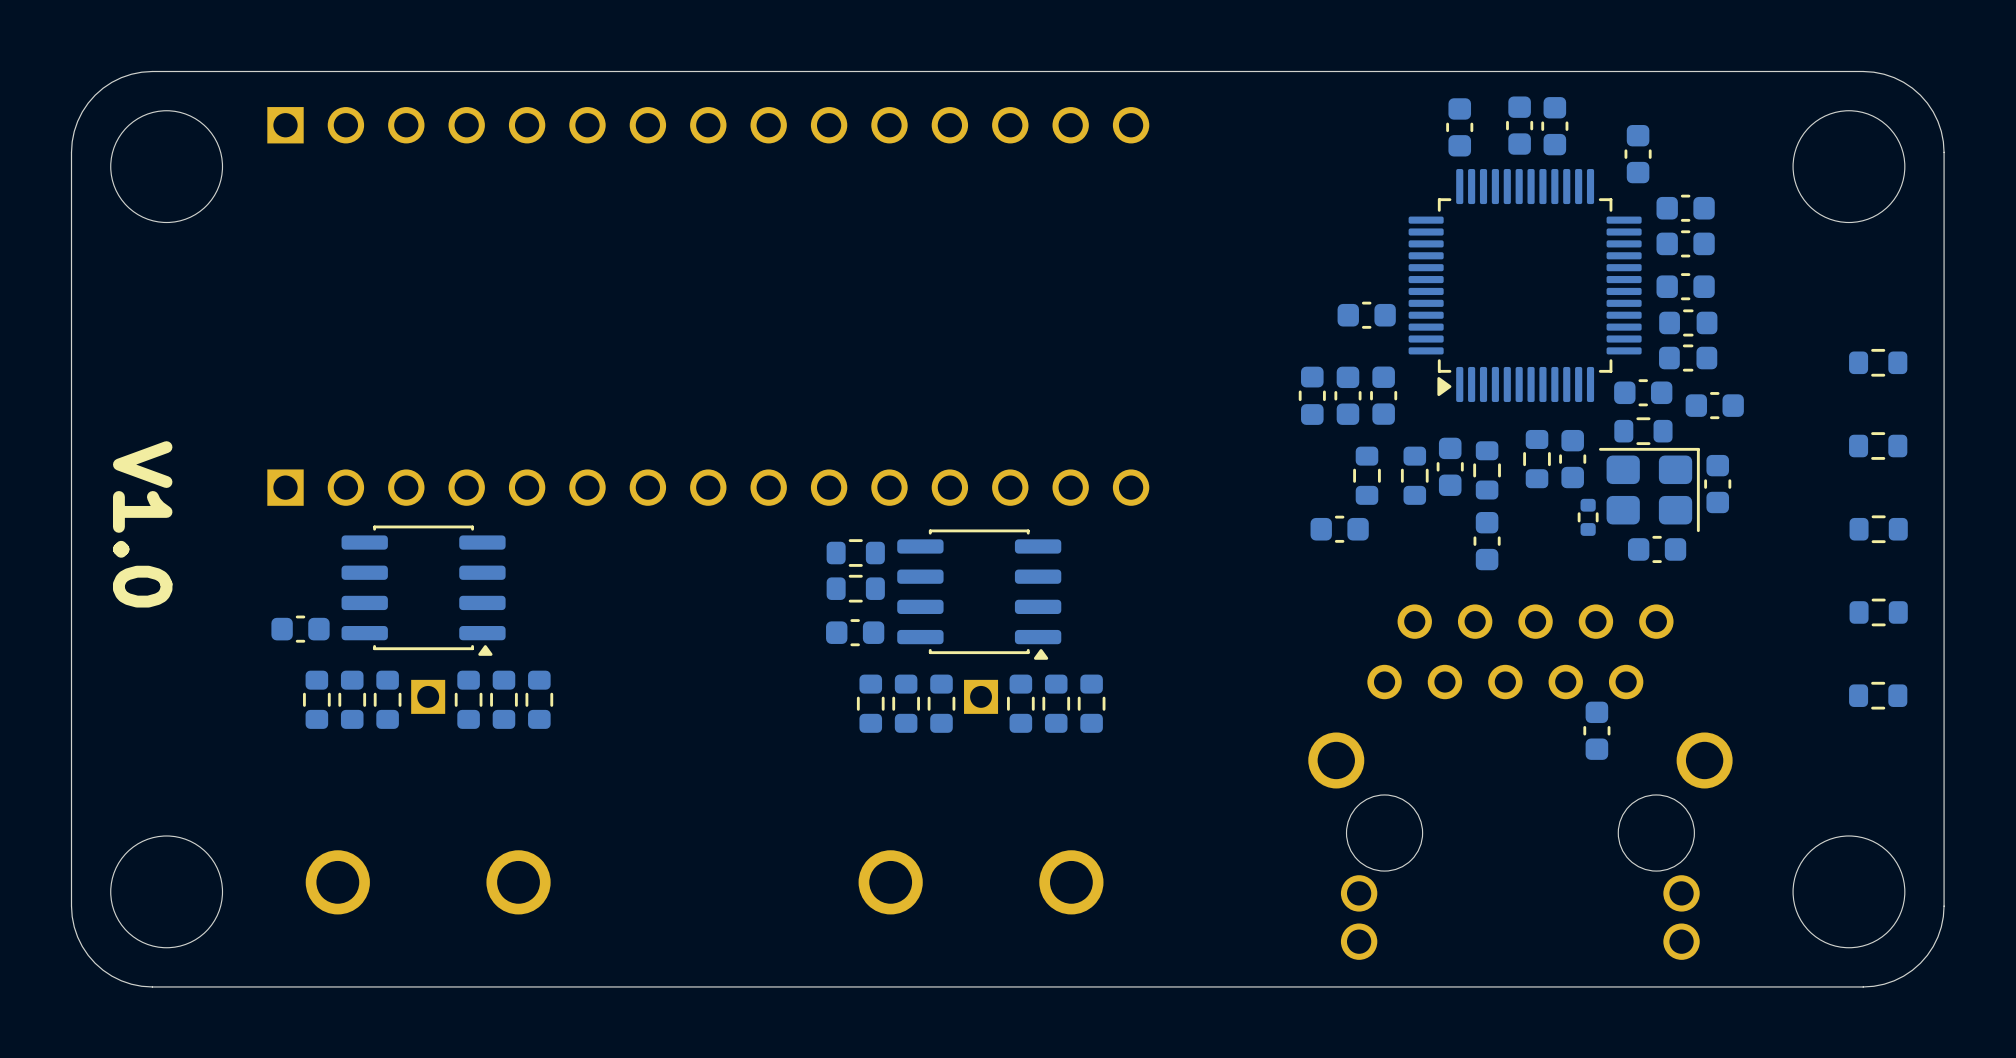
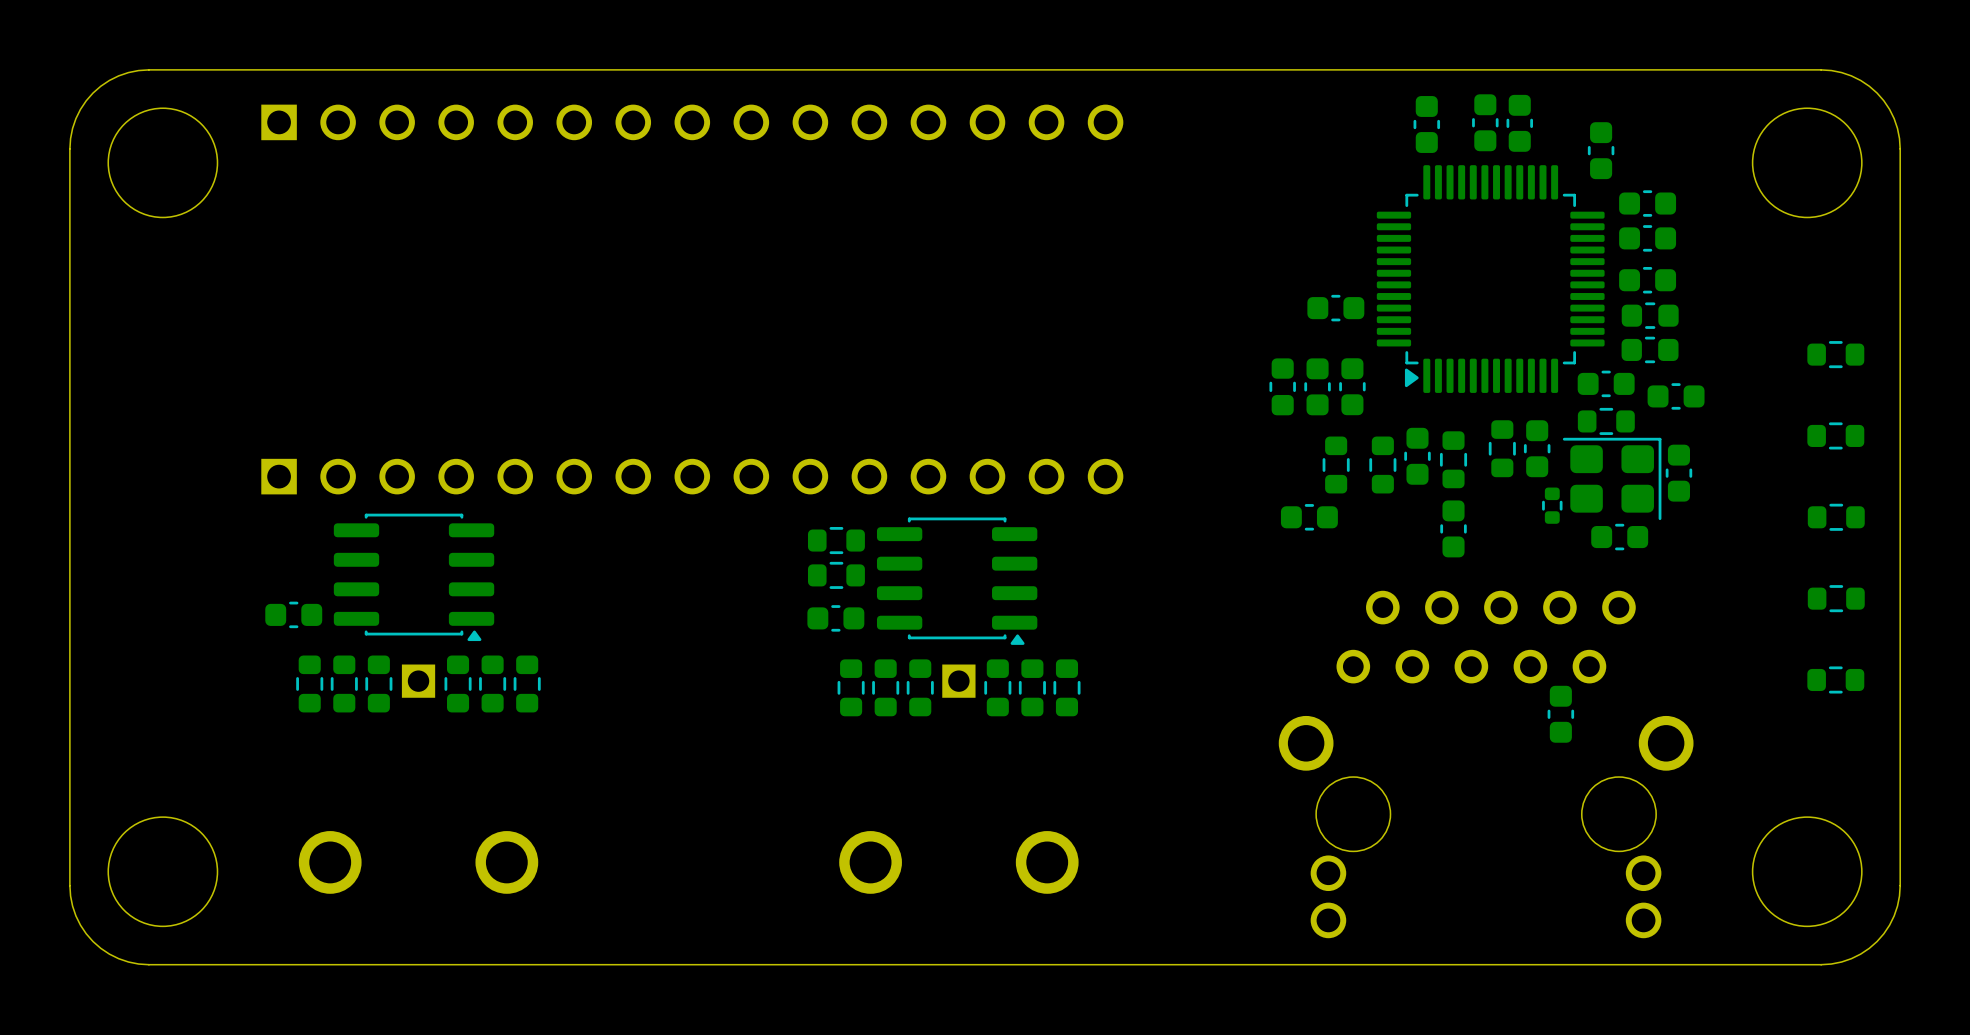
text: V1.0 (142, 524) -> none

